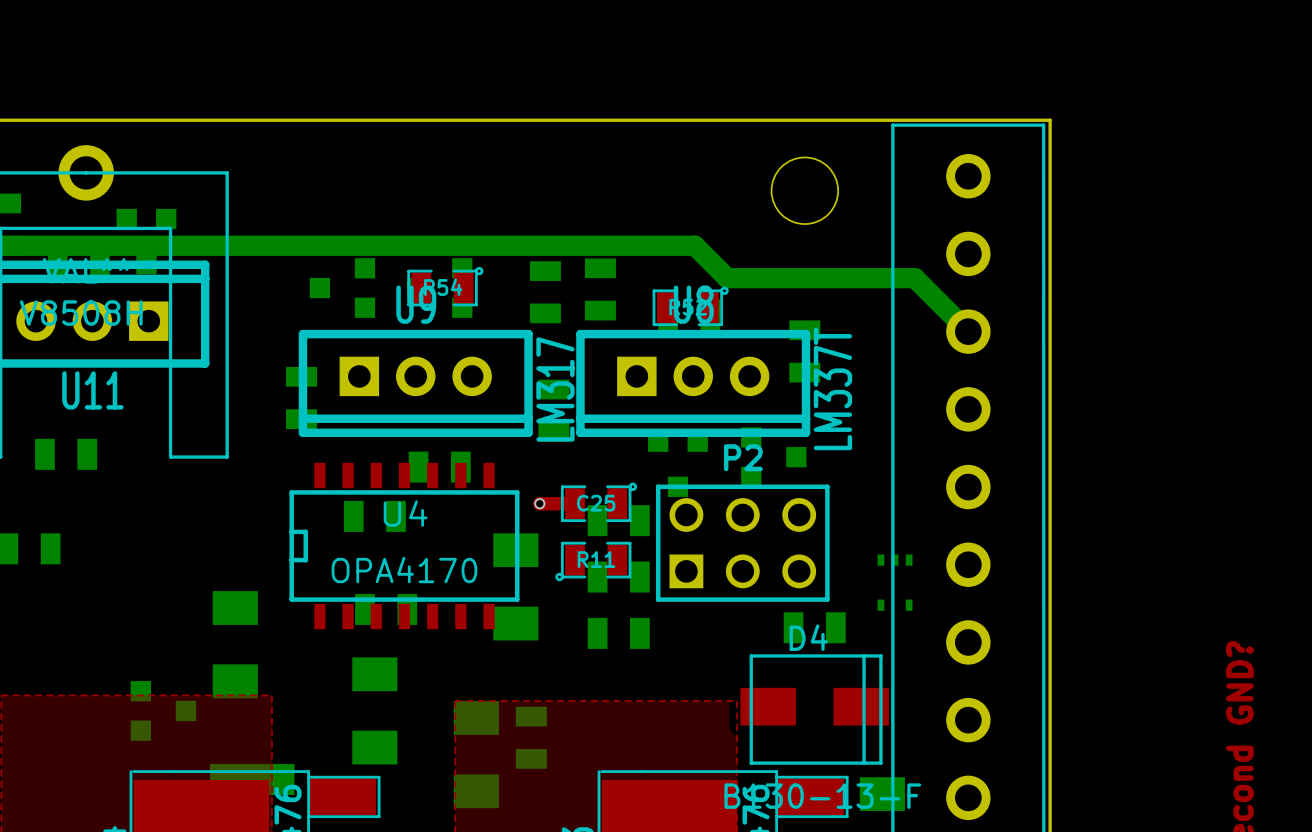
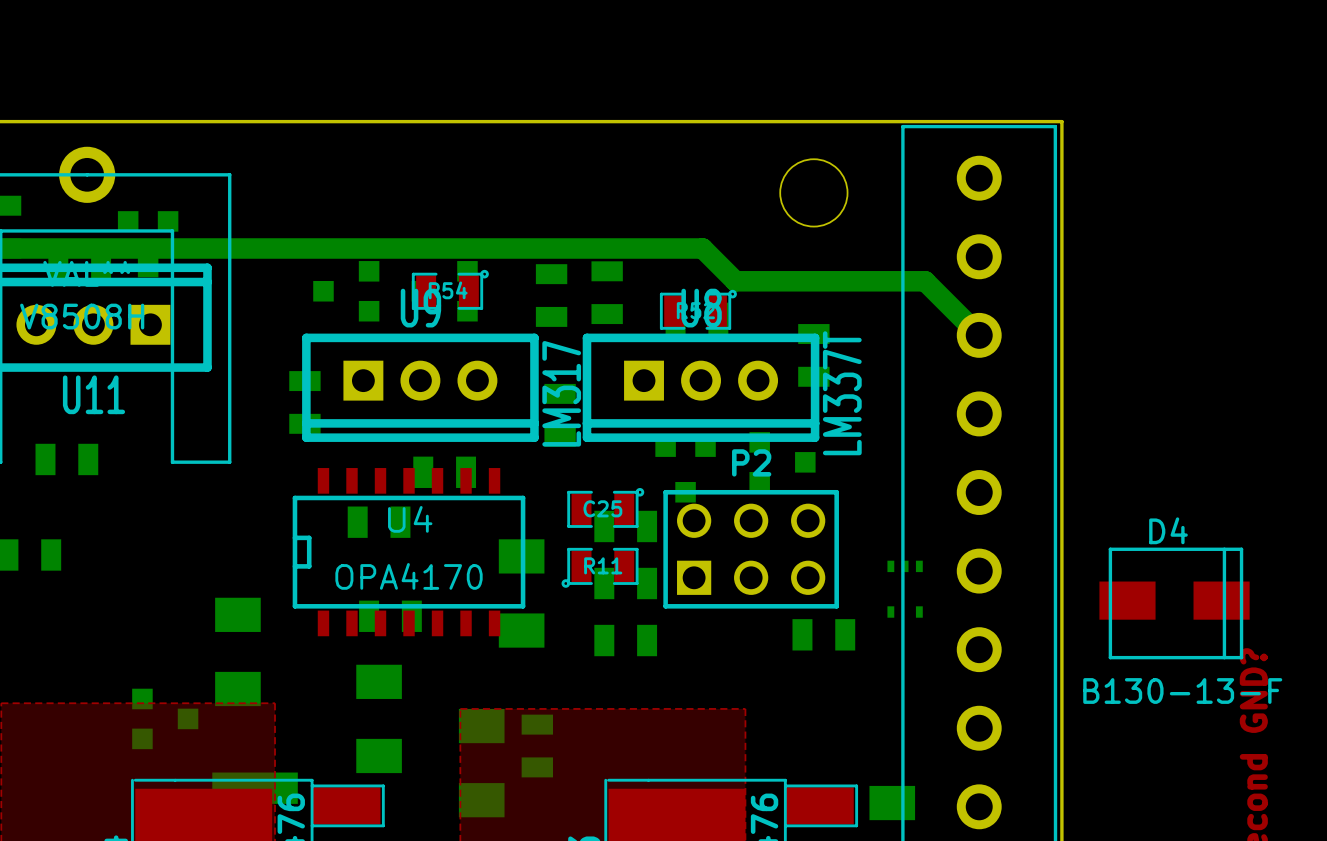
top track: (539, 503) (575, 503) -> none
via: (539, 503) -> none
D4 position: (814, 709) -> (1174, 603)

